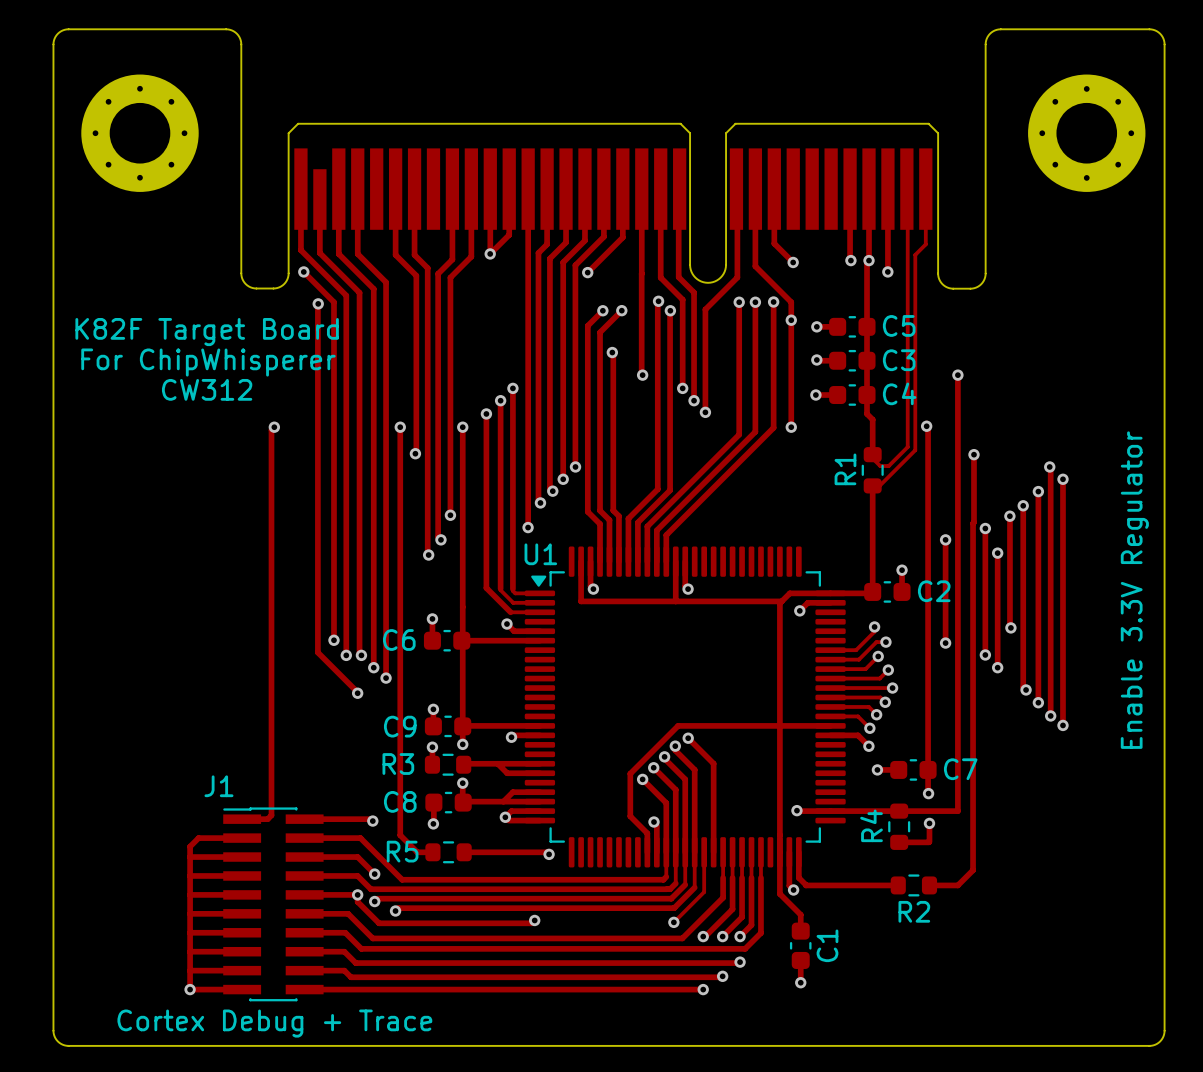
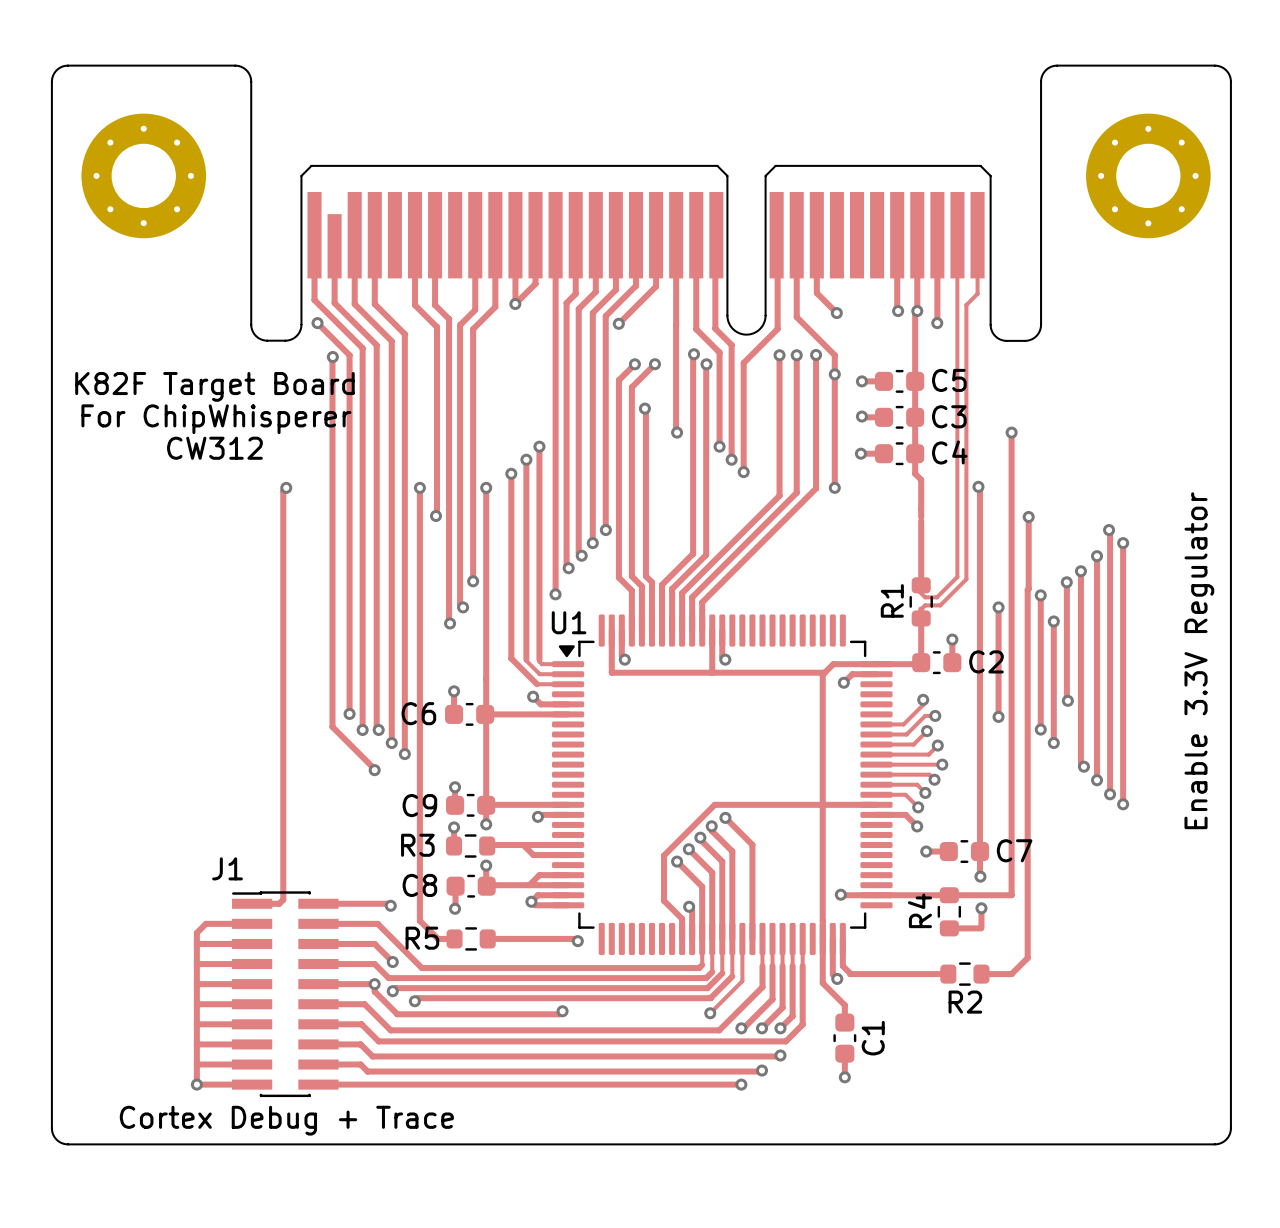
track: (906, 189) (907, 447) (888, 466) (880, 466) (872, 458) -> (957, 235) (957, 576) (936, 597) (925, 597) (919, 592) (919, 586)
track: (915, 450) (879, 485) (872, 485) -> (921, 521) (921, 550)
R1 position: (872, 470) -> (921, 601)
track: (872, 519) (872, 541) -> (966, 512) (966, 579) (940, 605) (925, 605) (921, 609)

